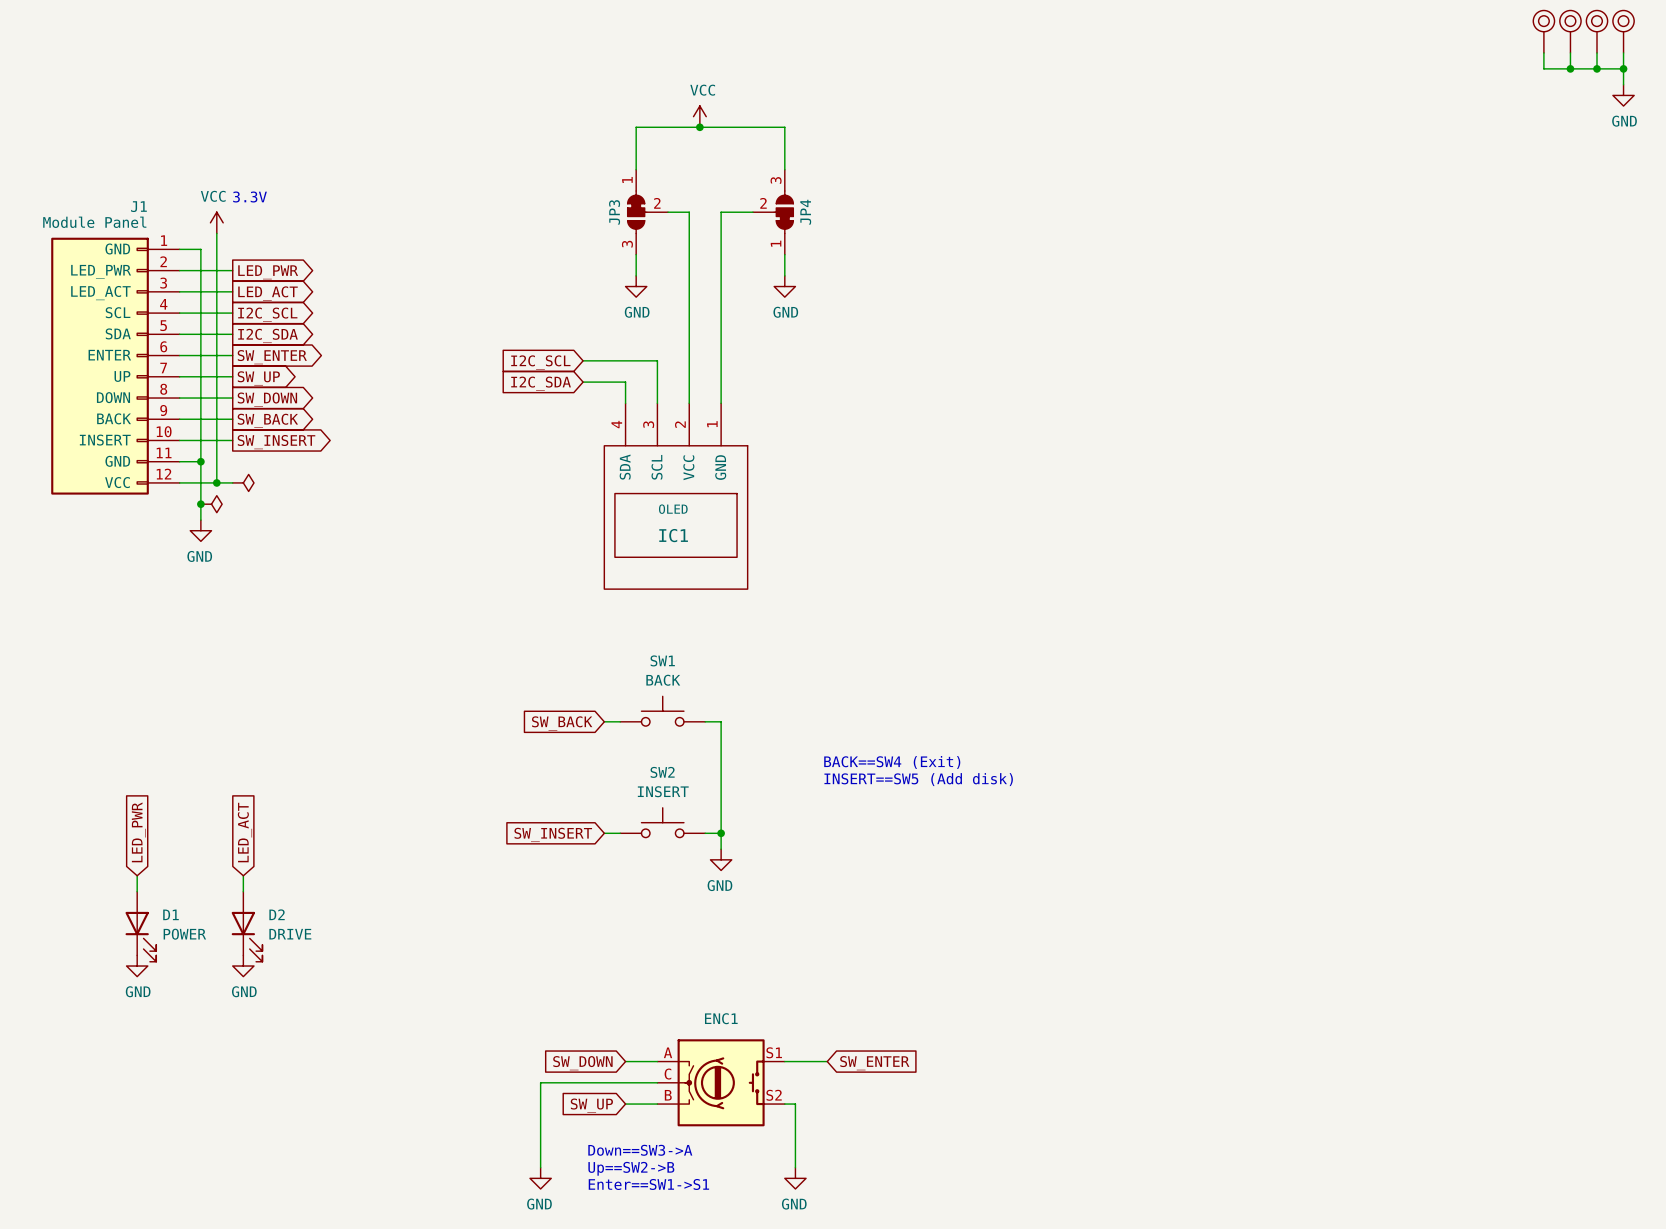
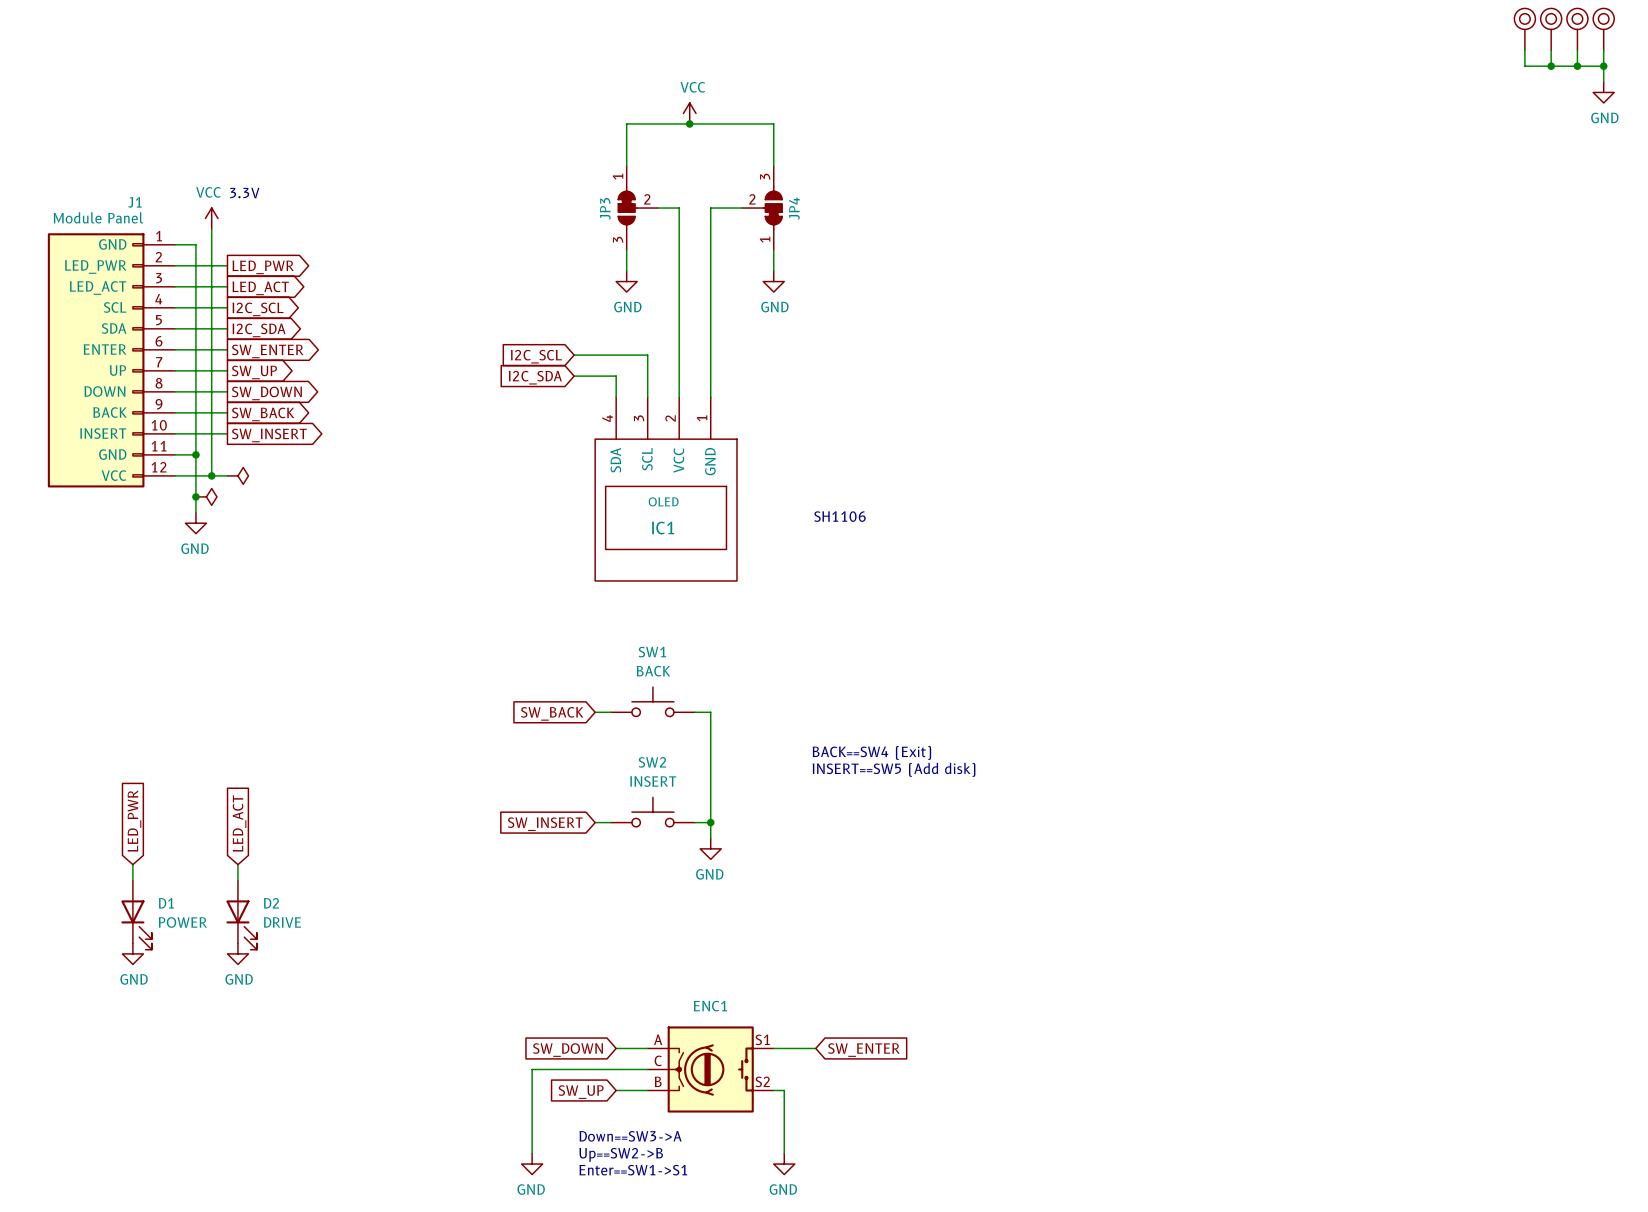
text: none -> SH1106 (839, 516)

